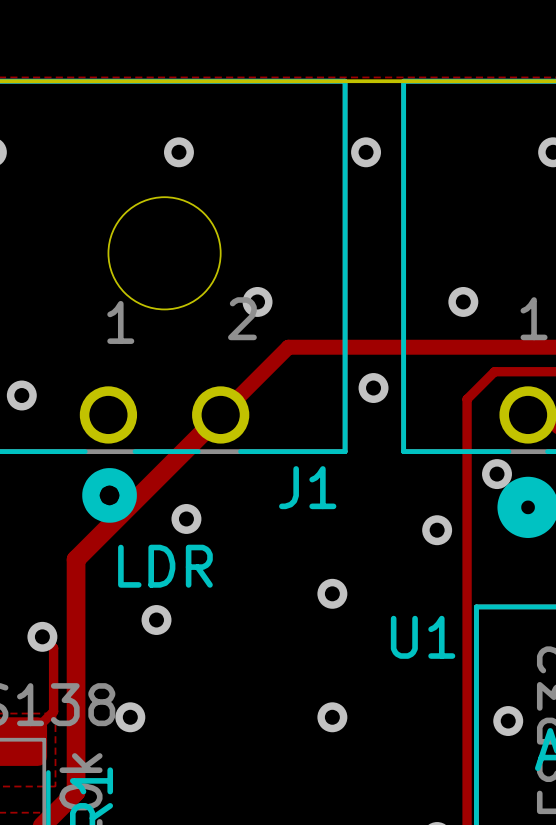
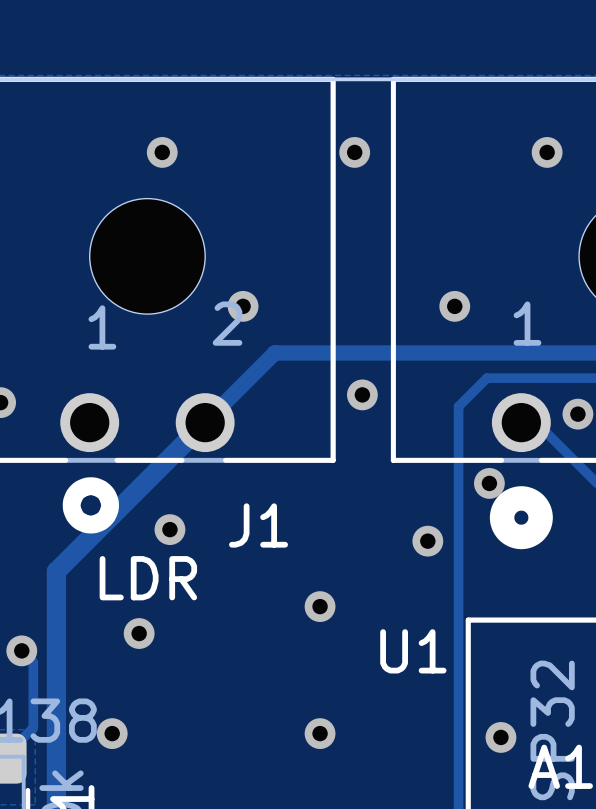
J1 name position: J1 (307, 487) -> J1 (258, 525)

